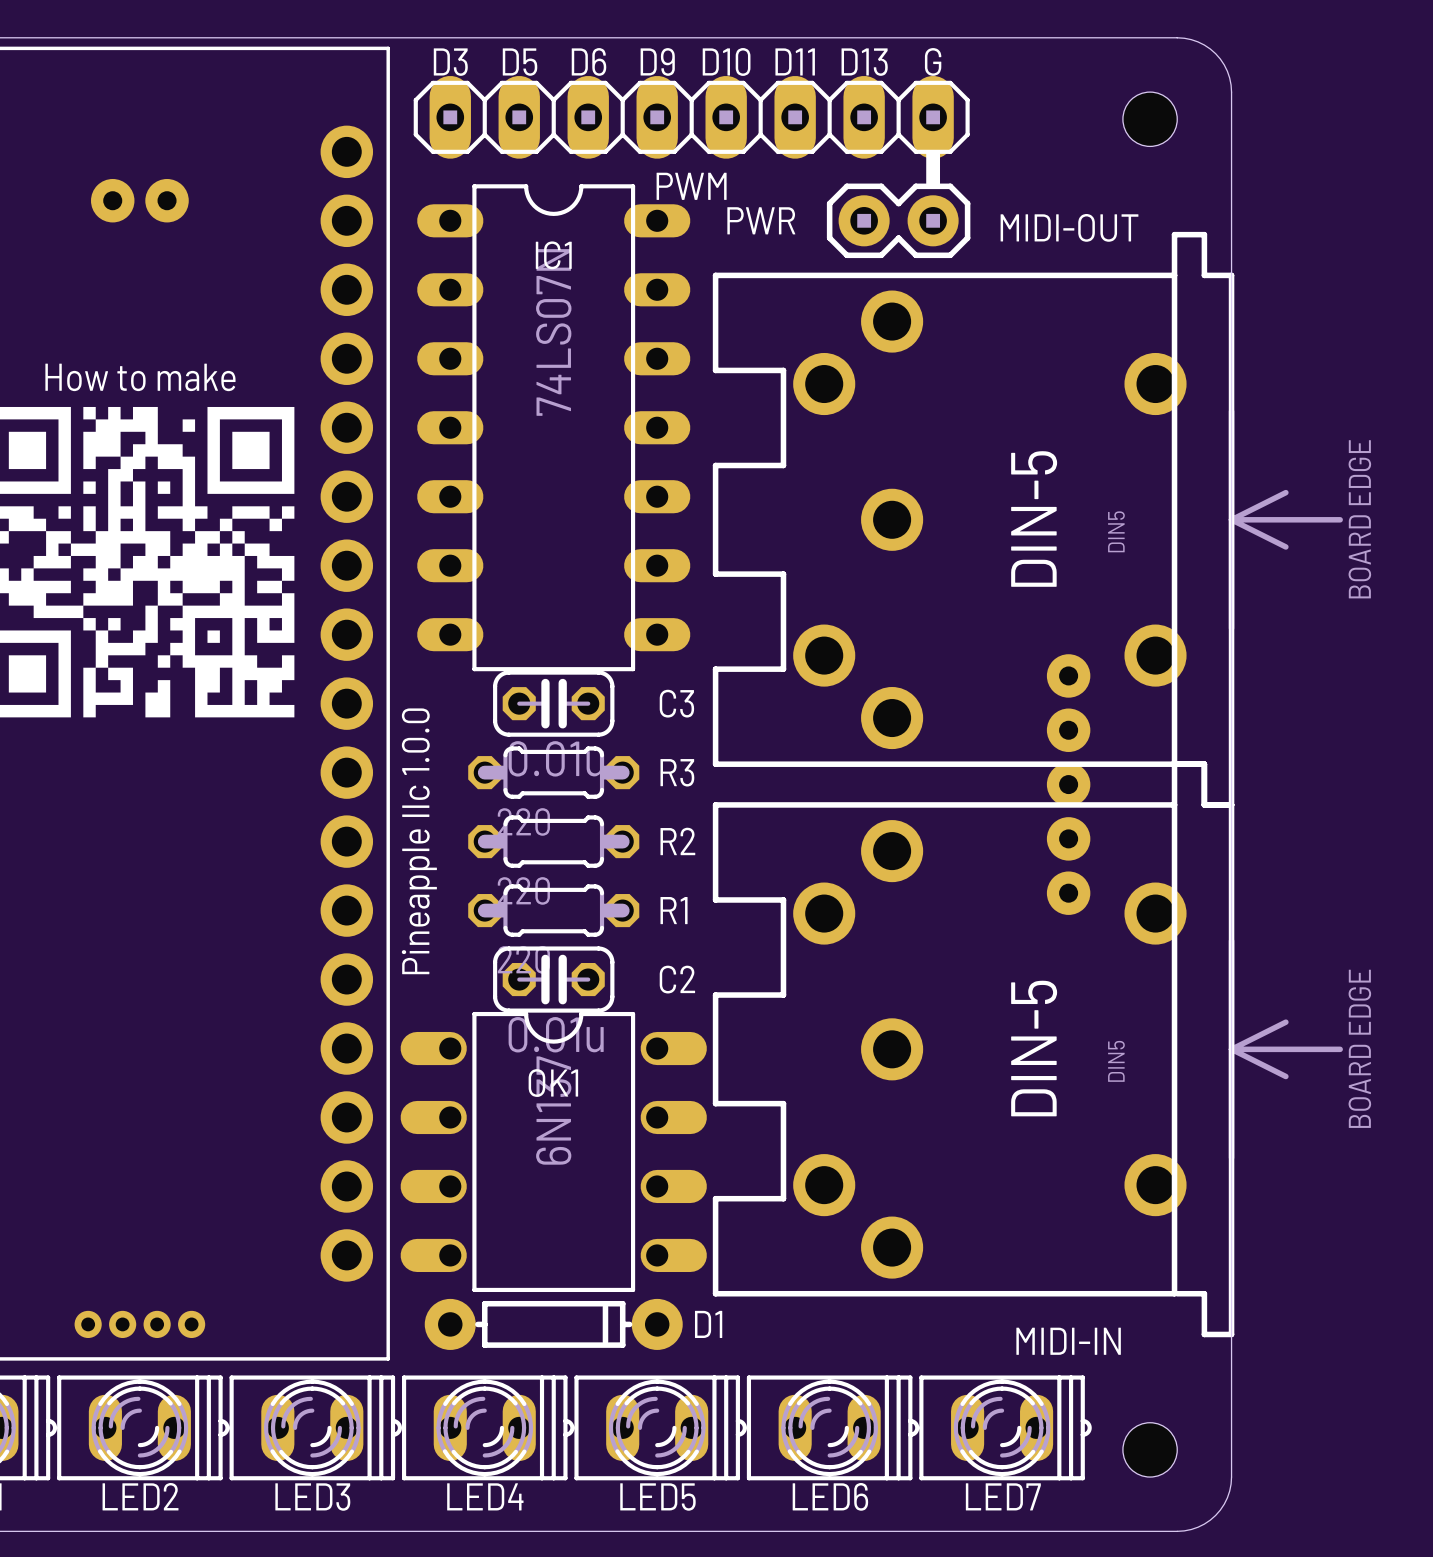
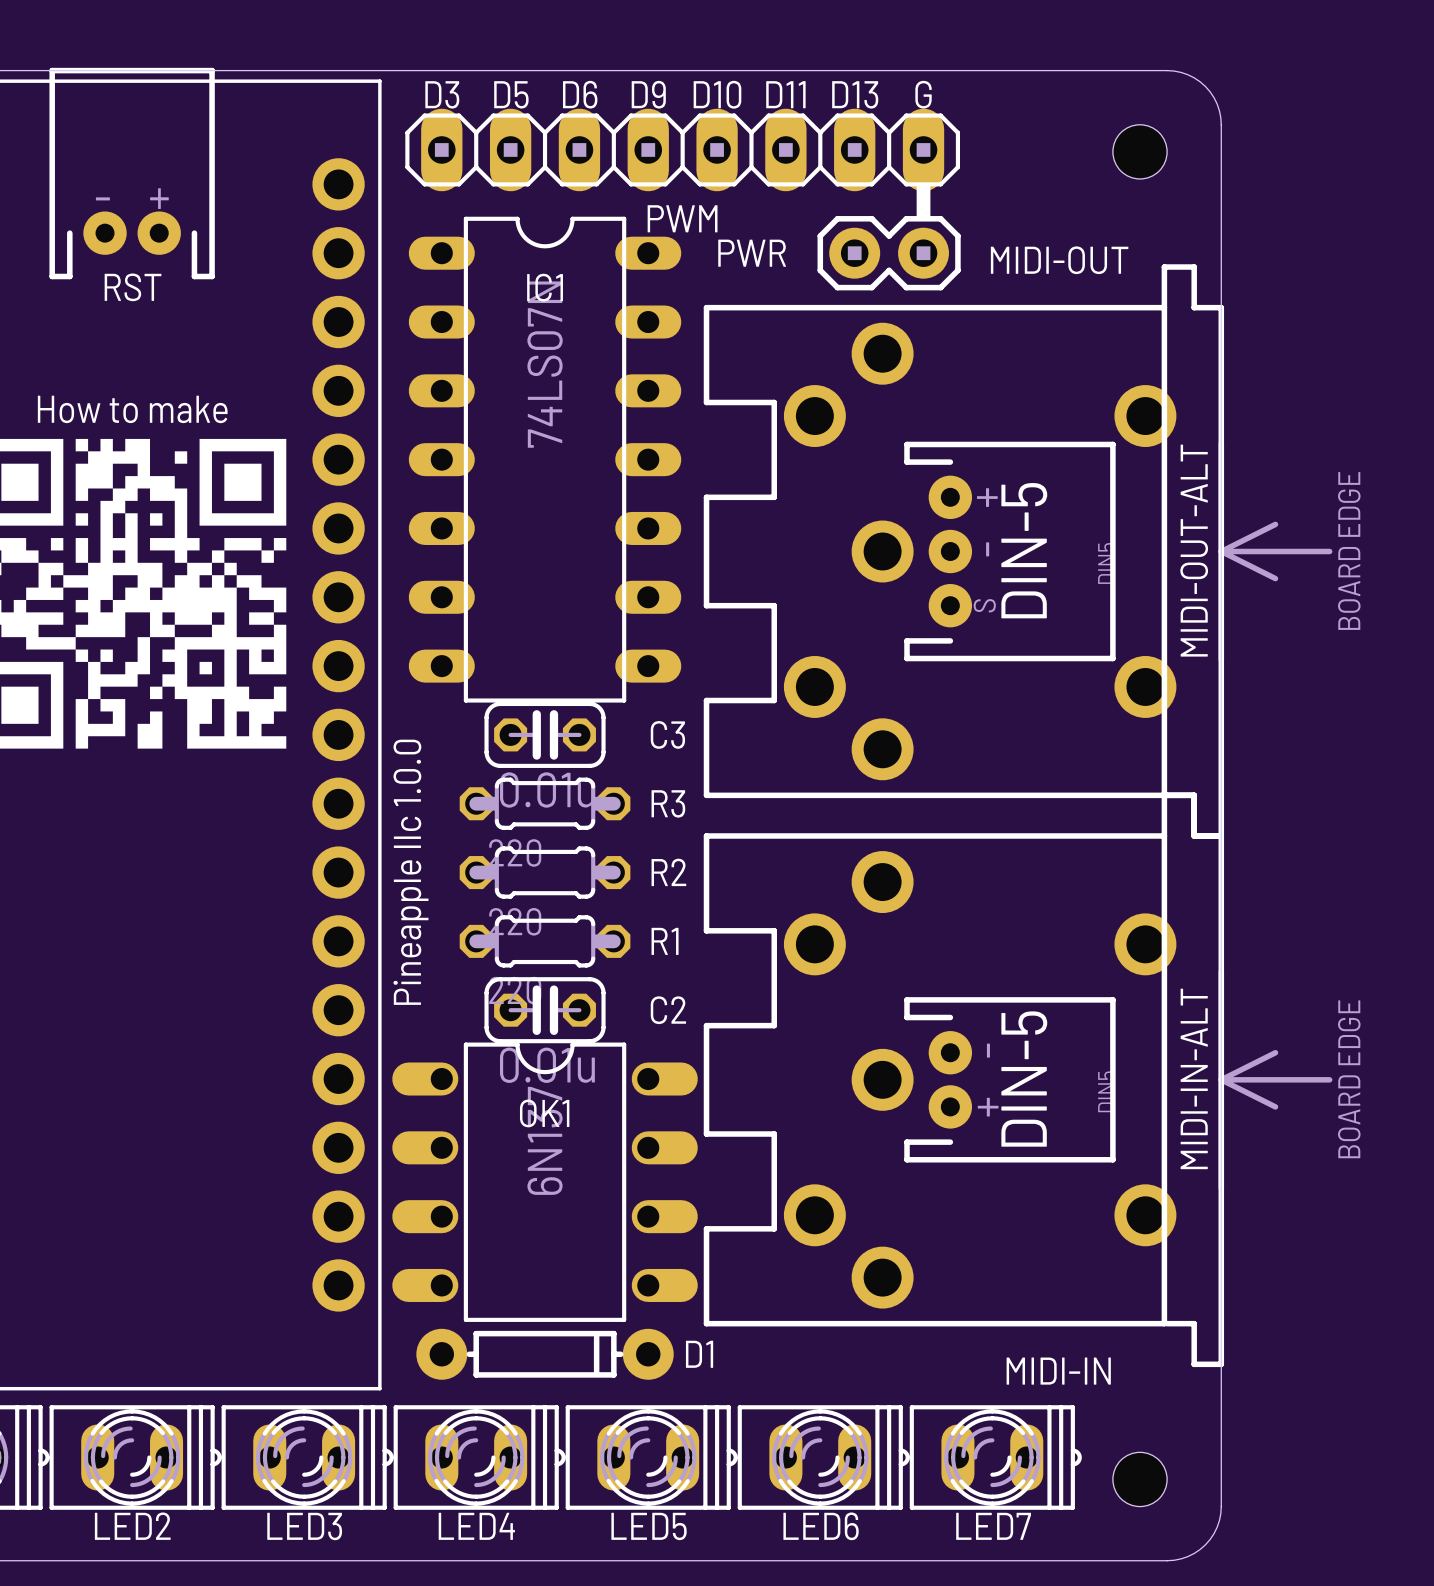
RST side: bottom (139, 200) -> top (132, 173)
MIDI-OUT-ALT: none -> (1009, 551)
part: (1068, 784) -> none
MIDI-IN-ALT: none -> (1009, 1079)
part: (139, 1324) -> none

